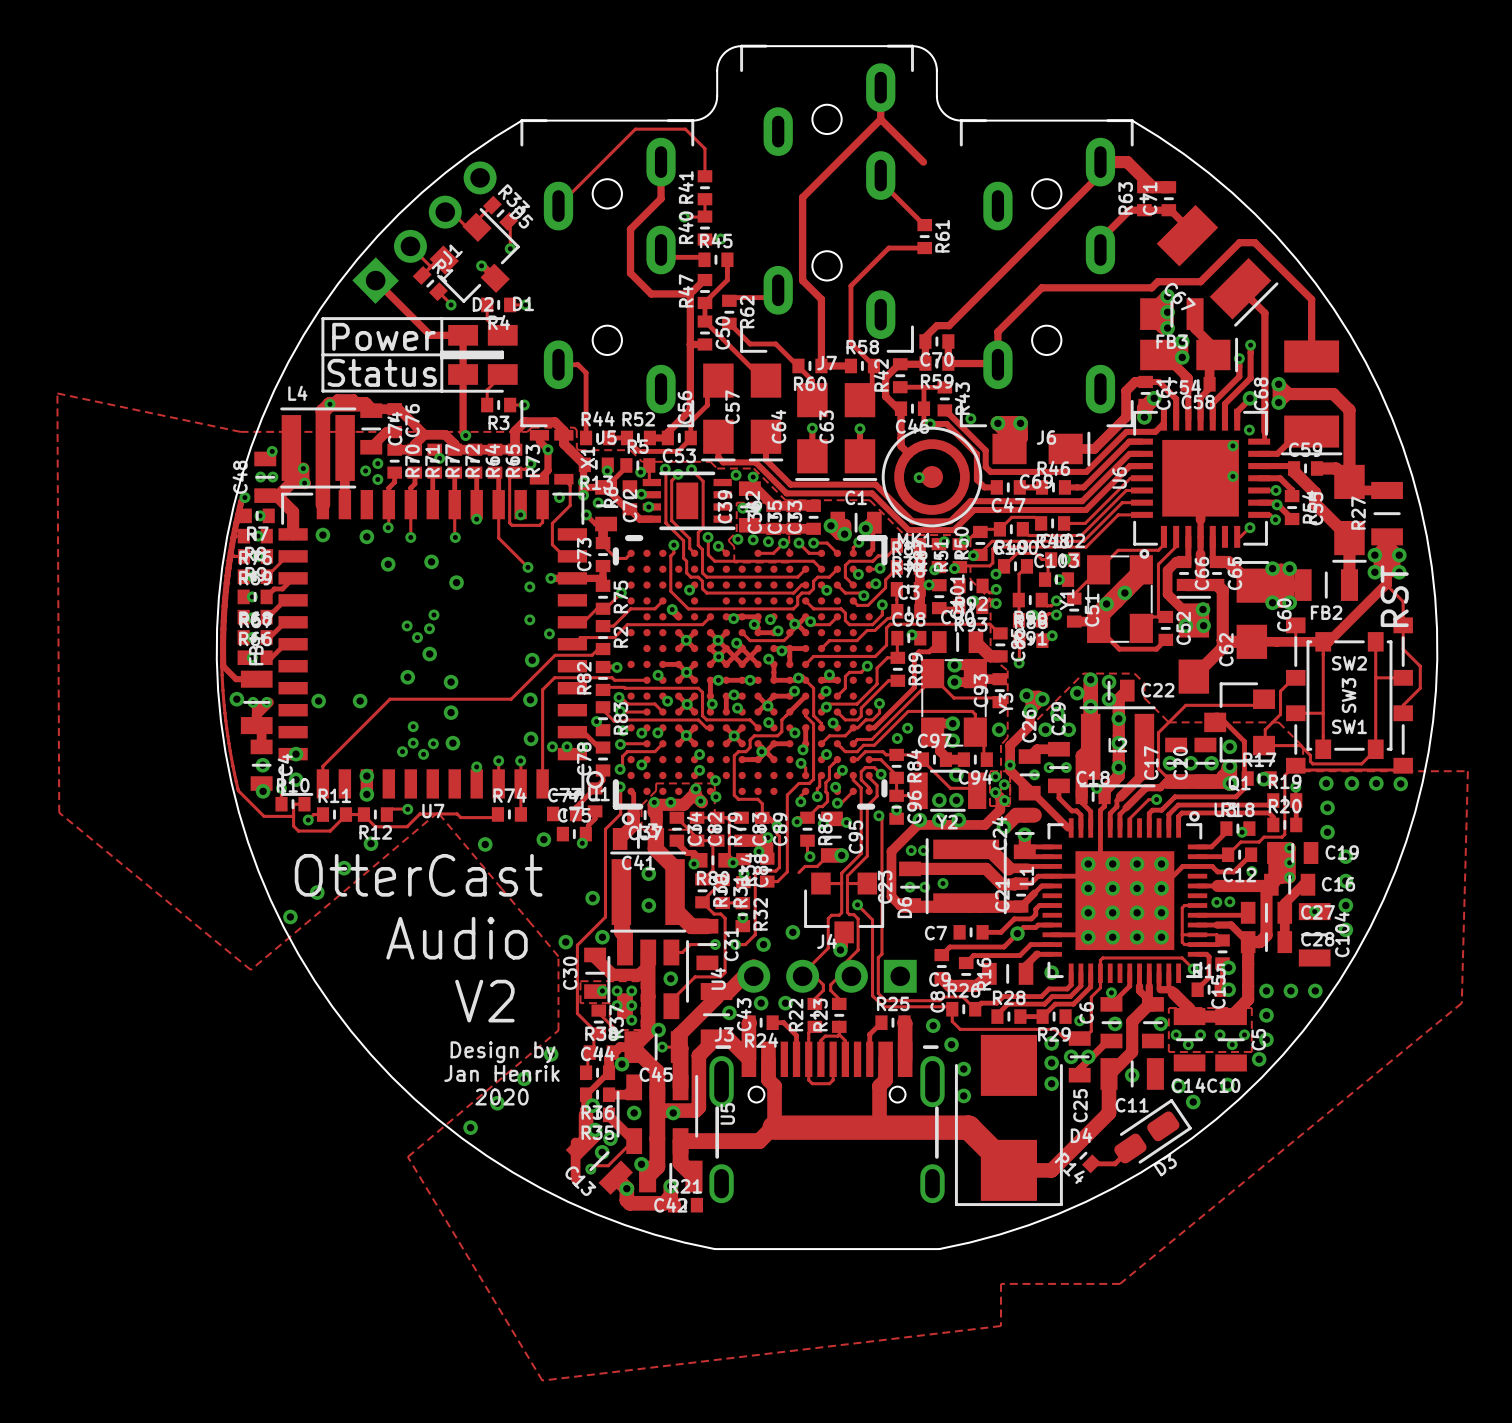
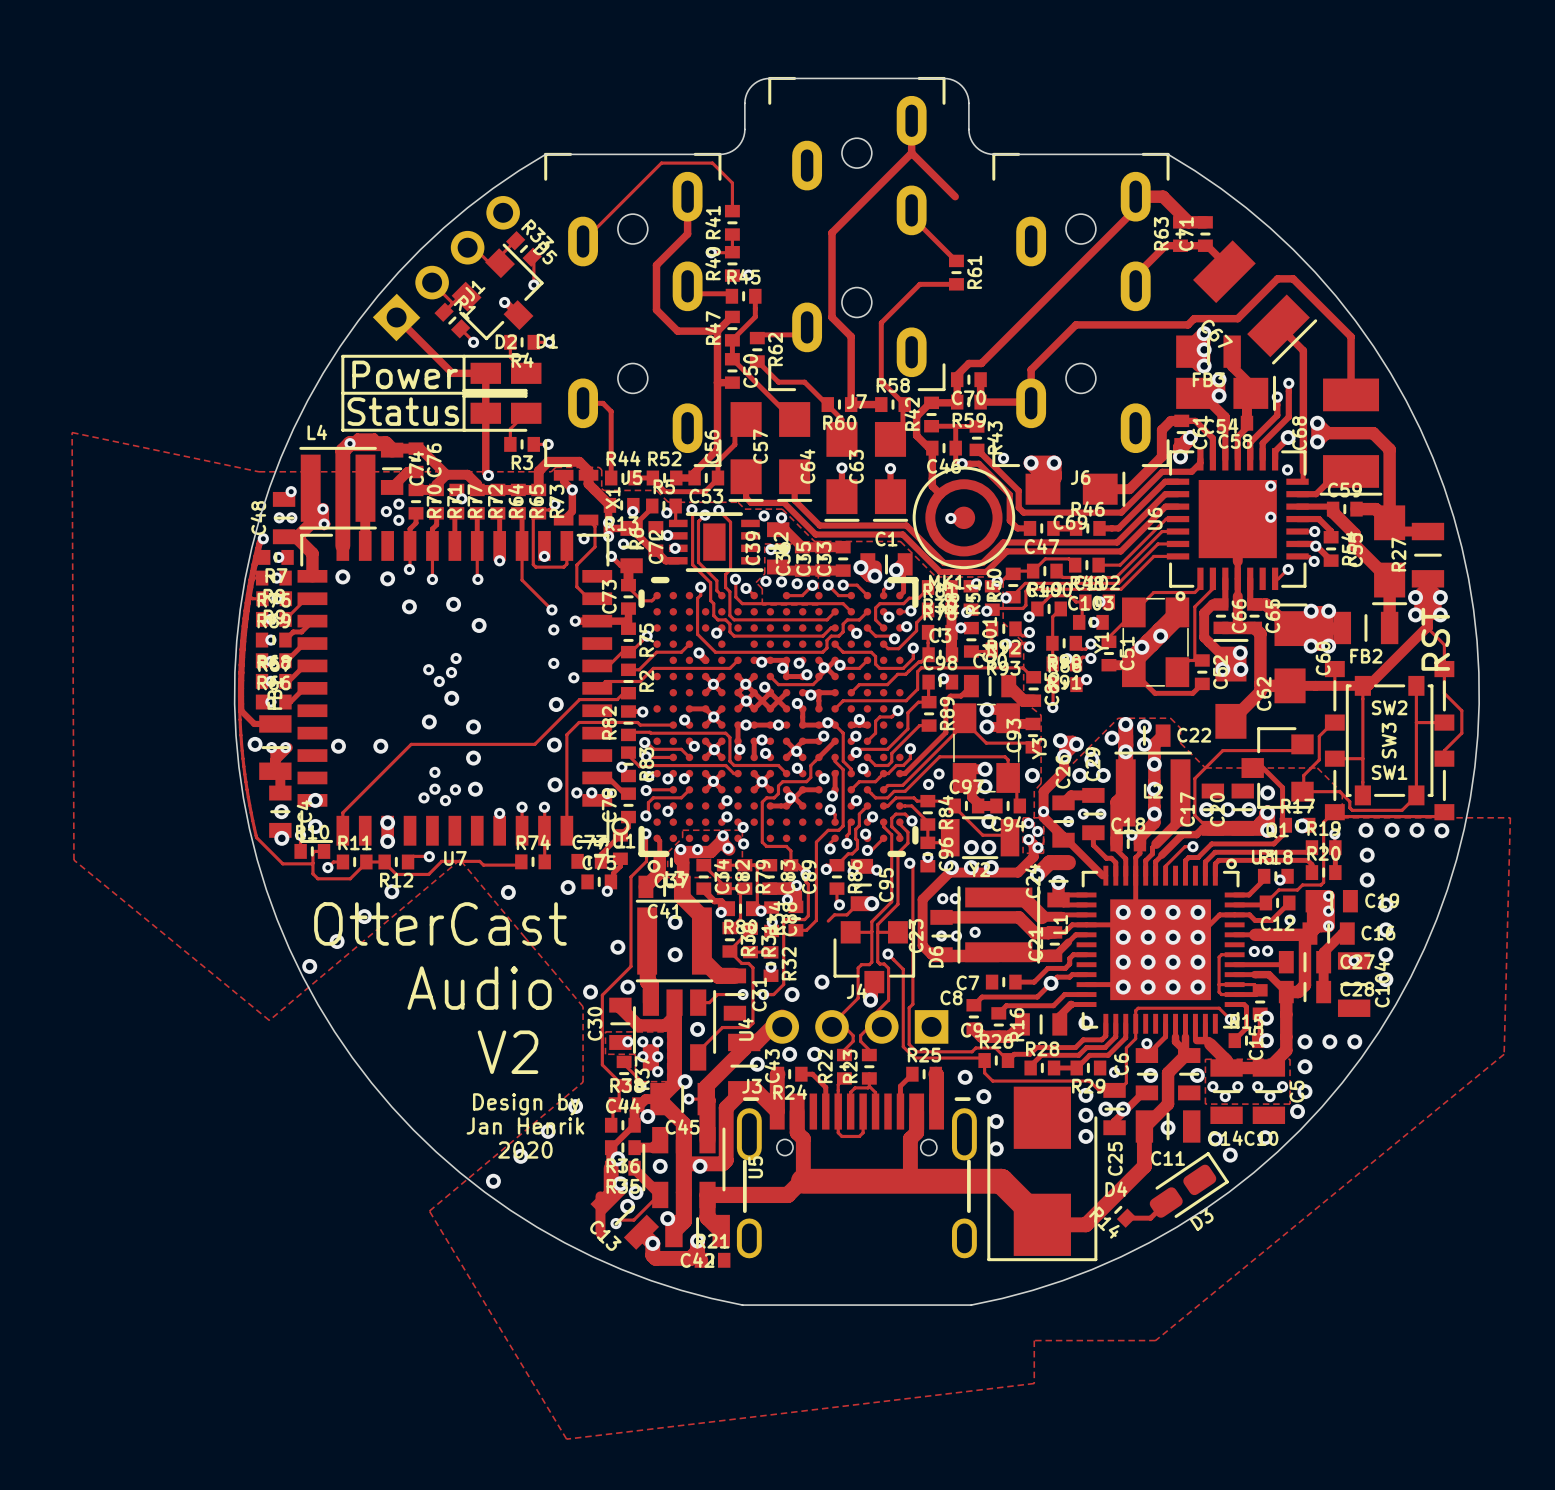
C8 name rotation: 0° (937, 1001) -> 90° clockwise (951, 997)
C8 name position: C8 (937, 1001) -> C8 (951, 997)

